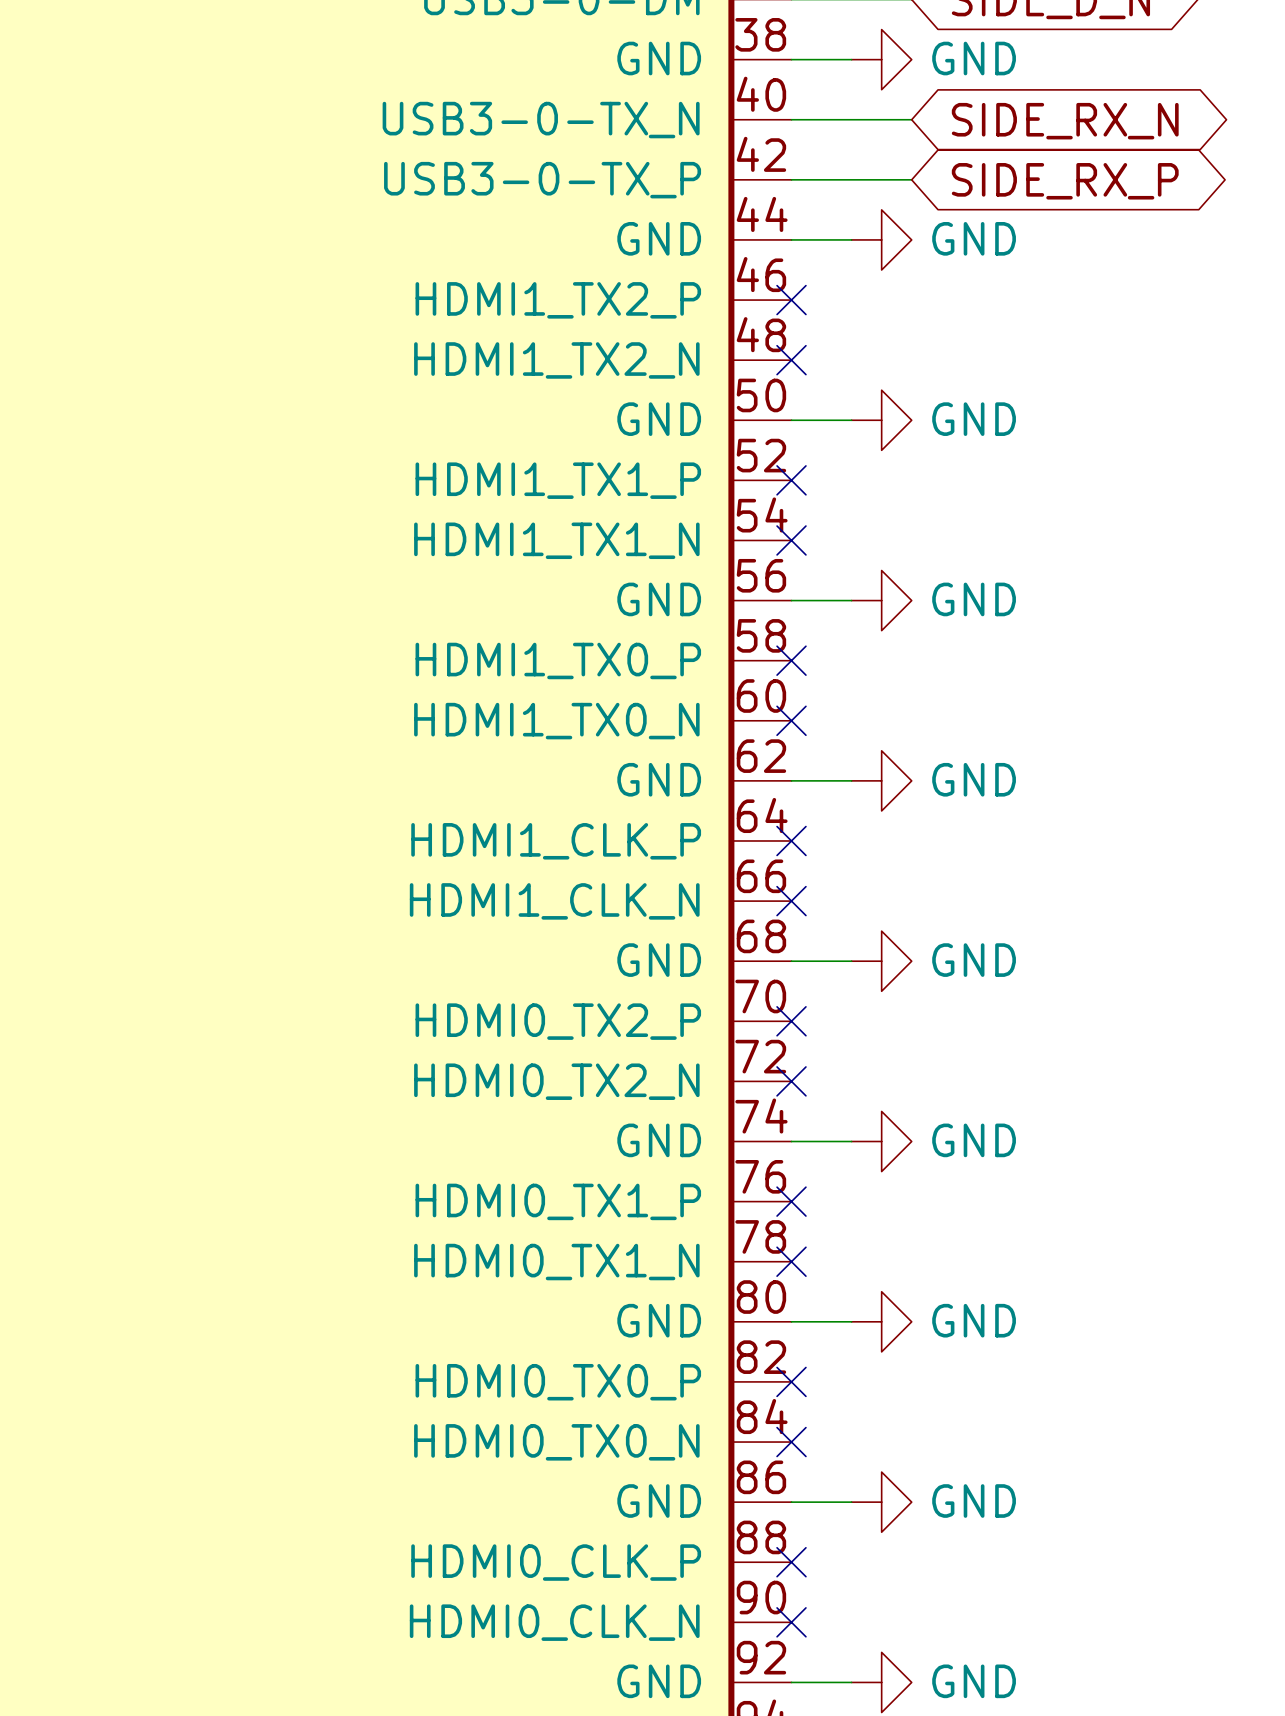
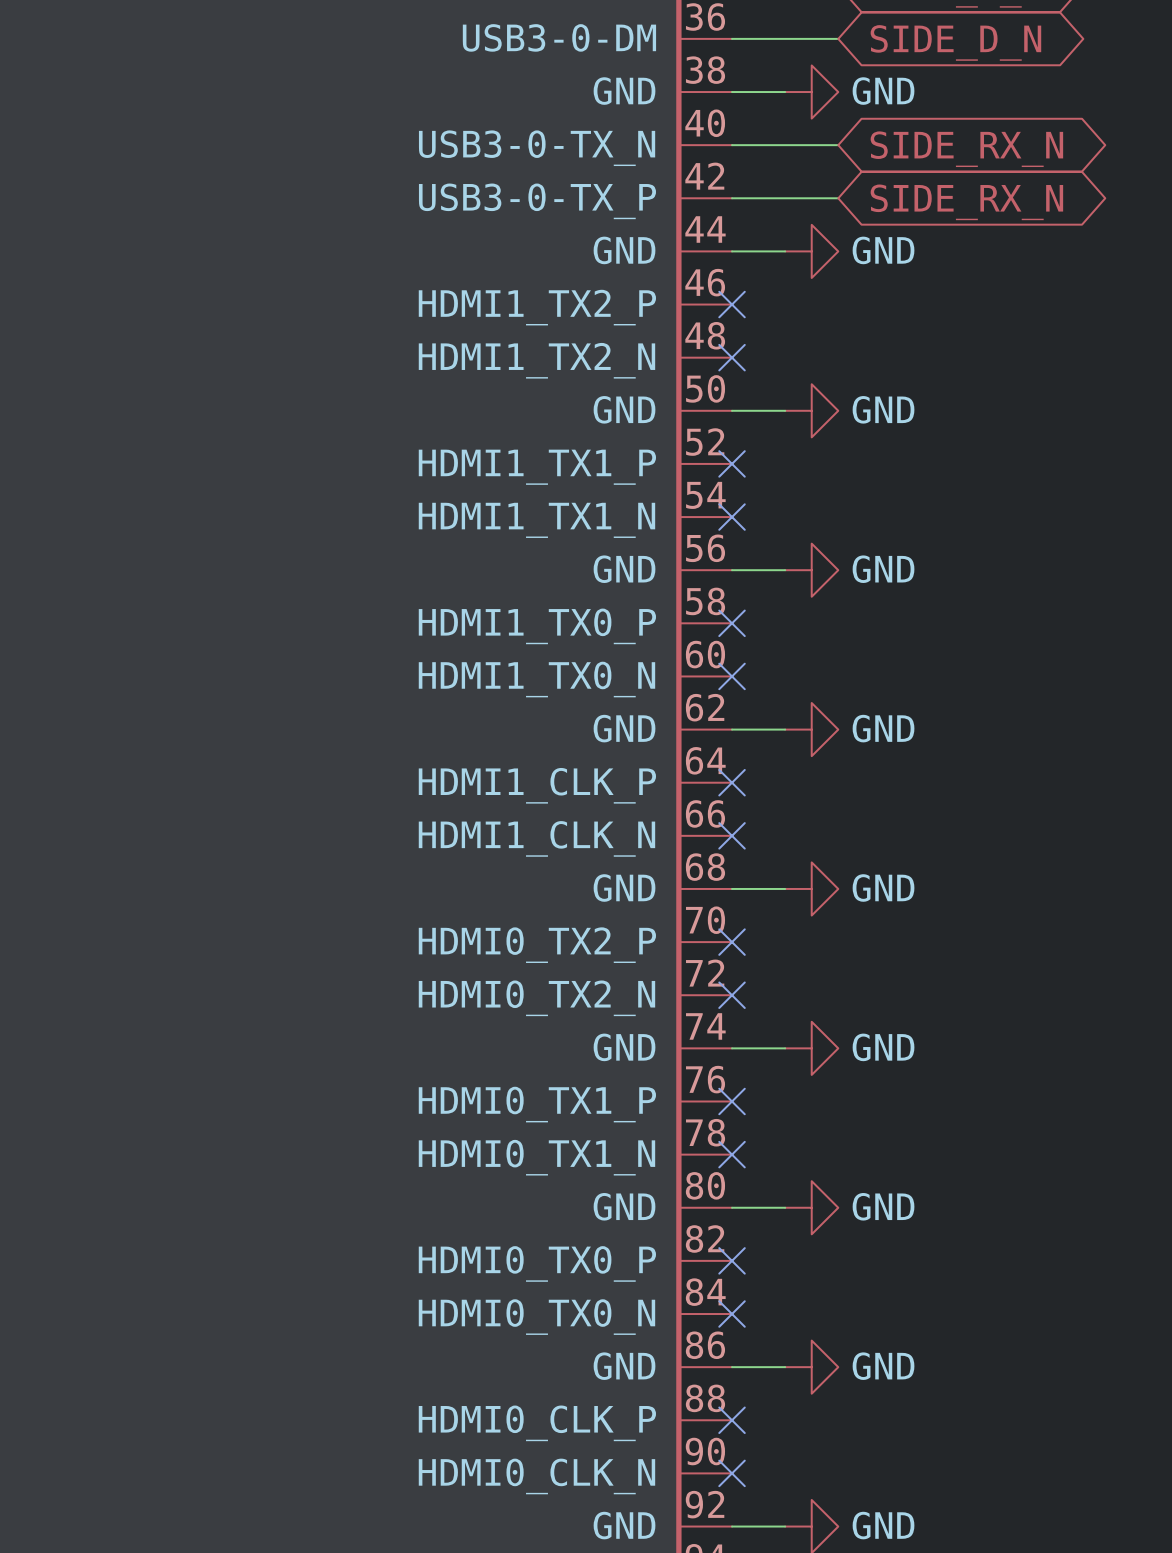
global label: SIDE_RX_P (1065, 181) -> SIDE_RX_N (966, 202)

